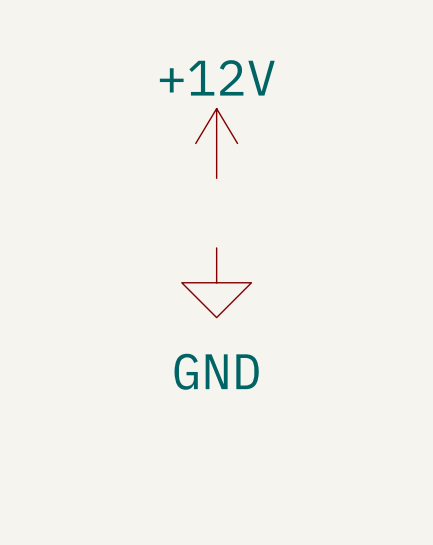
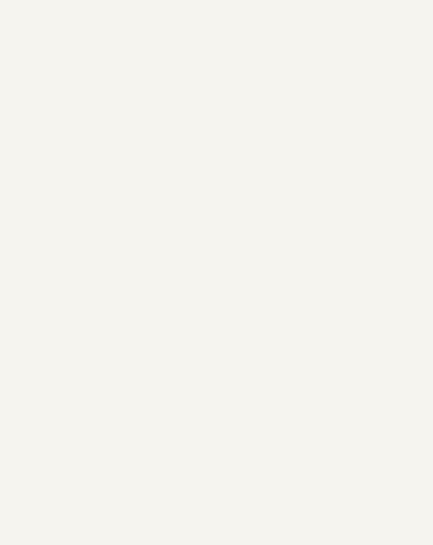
power symbol: +12V (216, 143) -> none
power symbol: GND (216, 282) -> none

